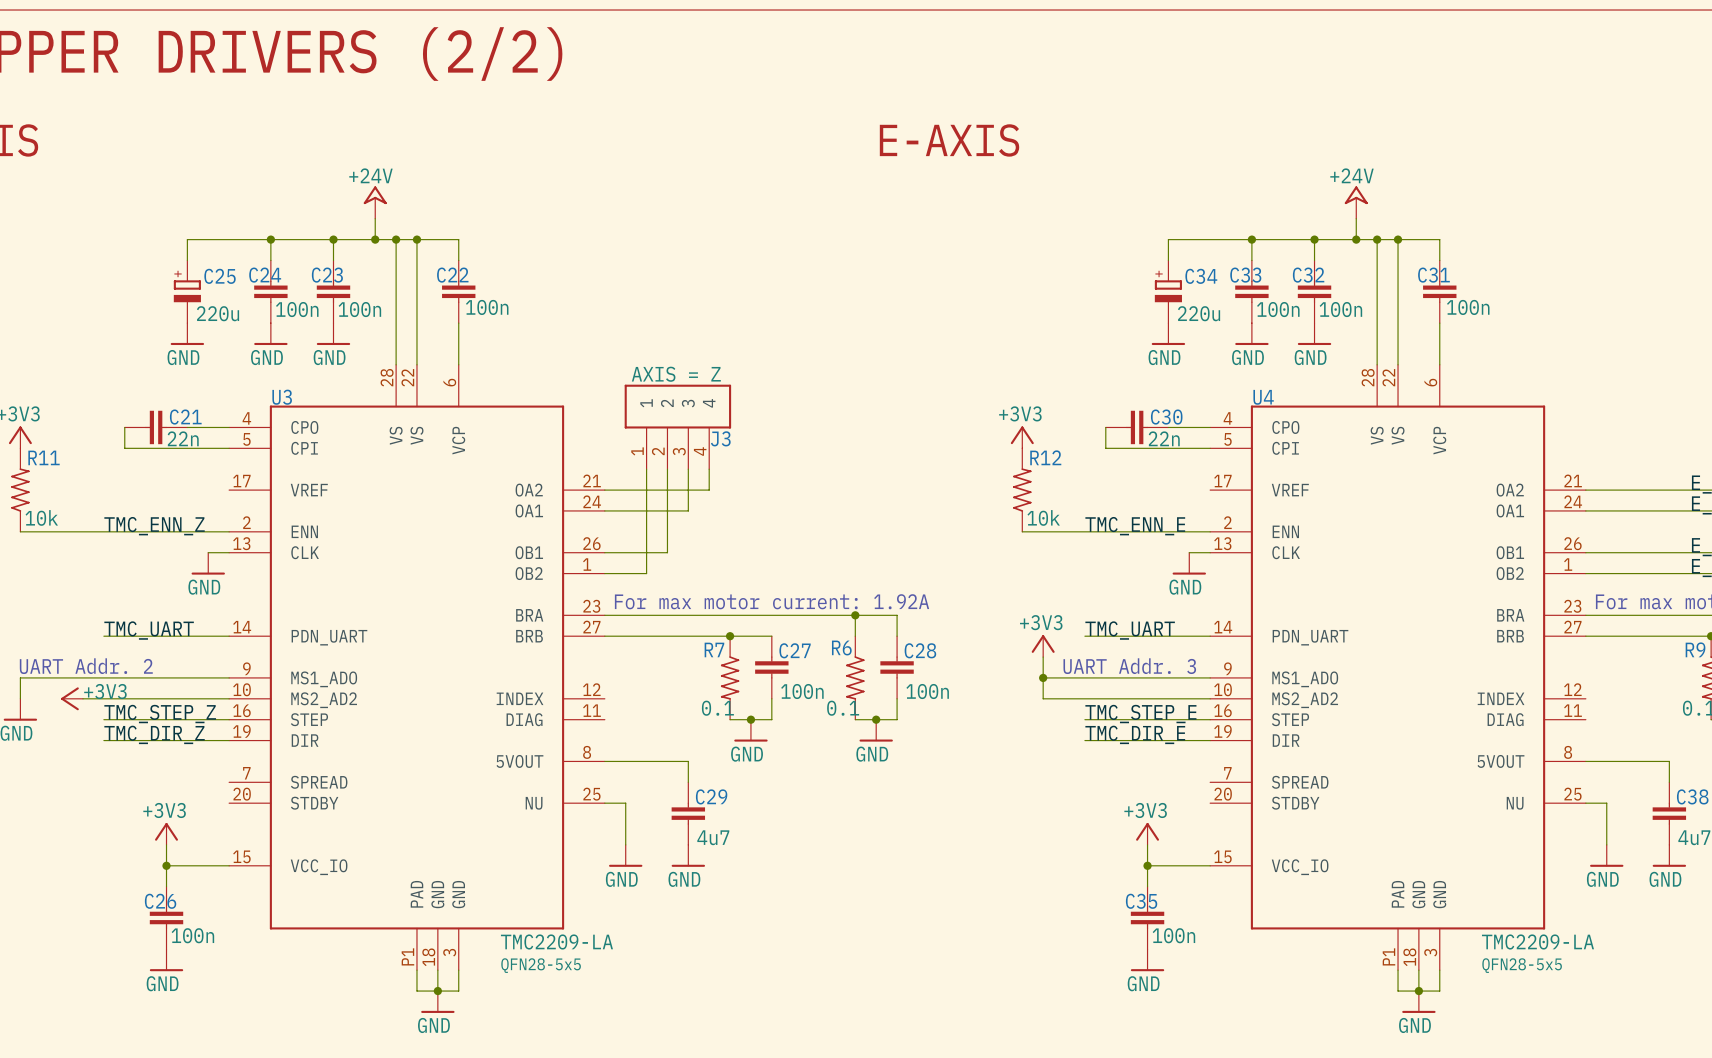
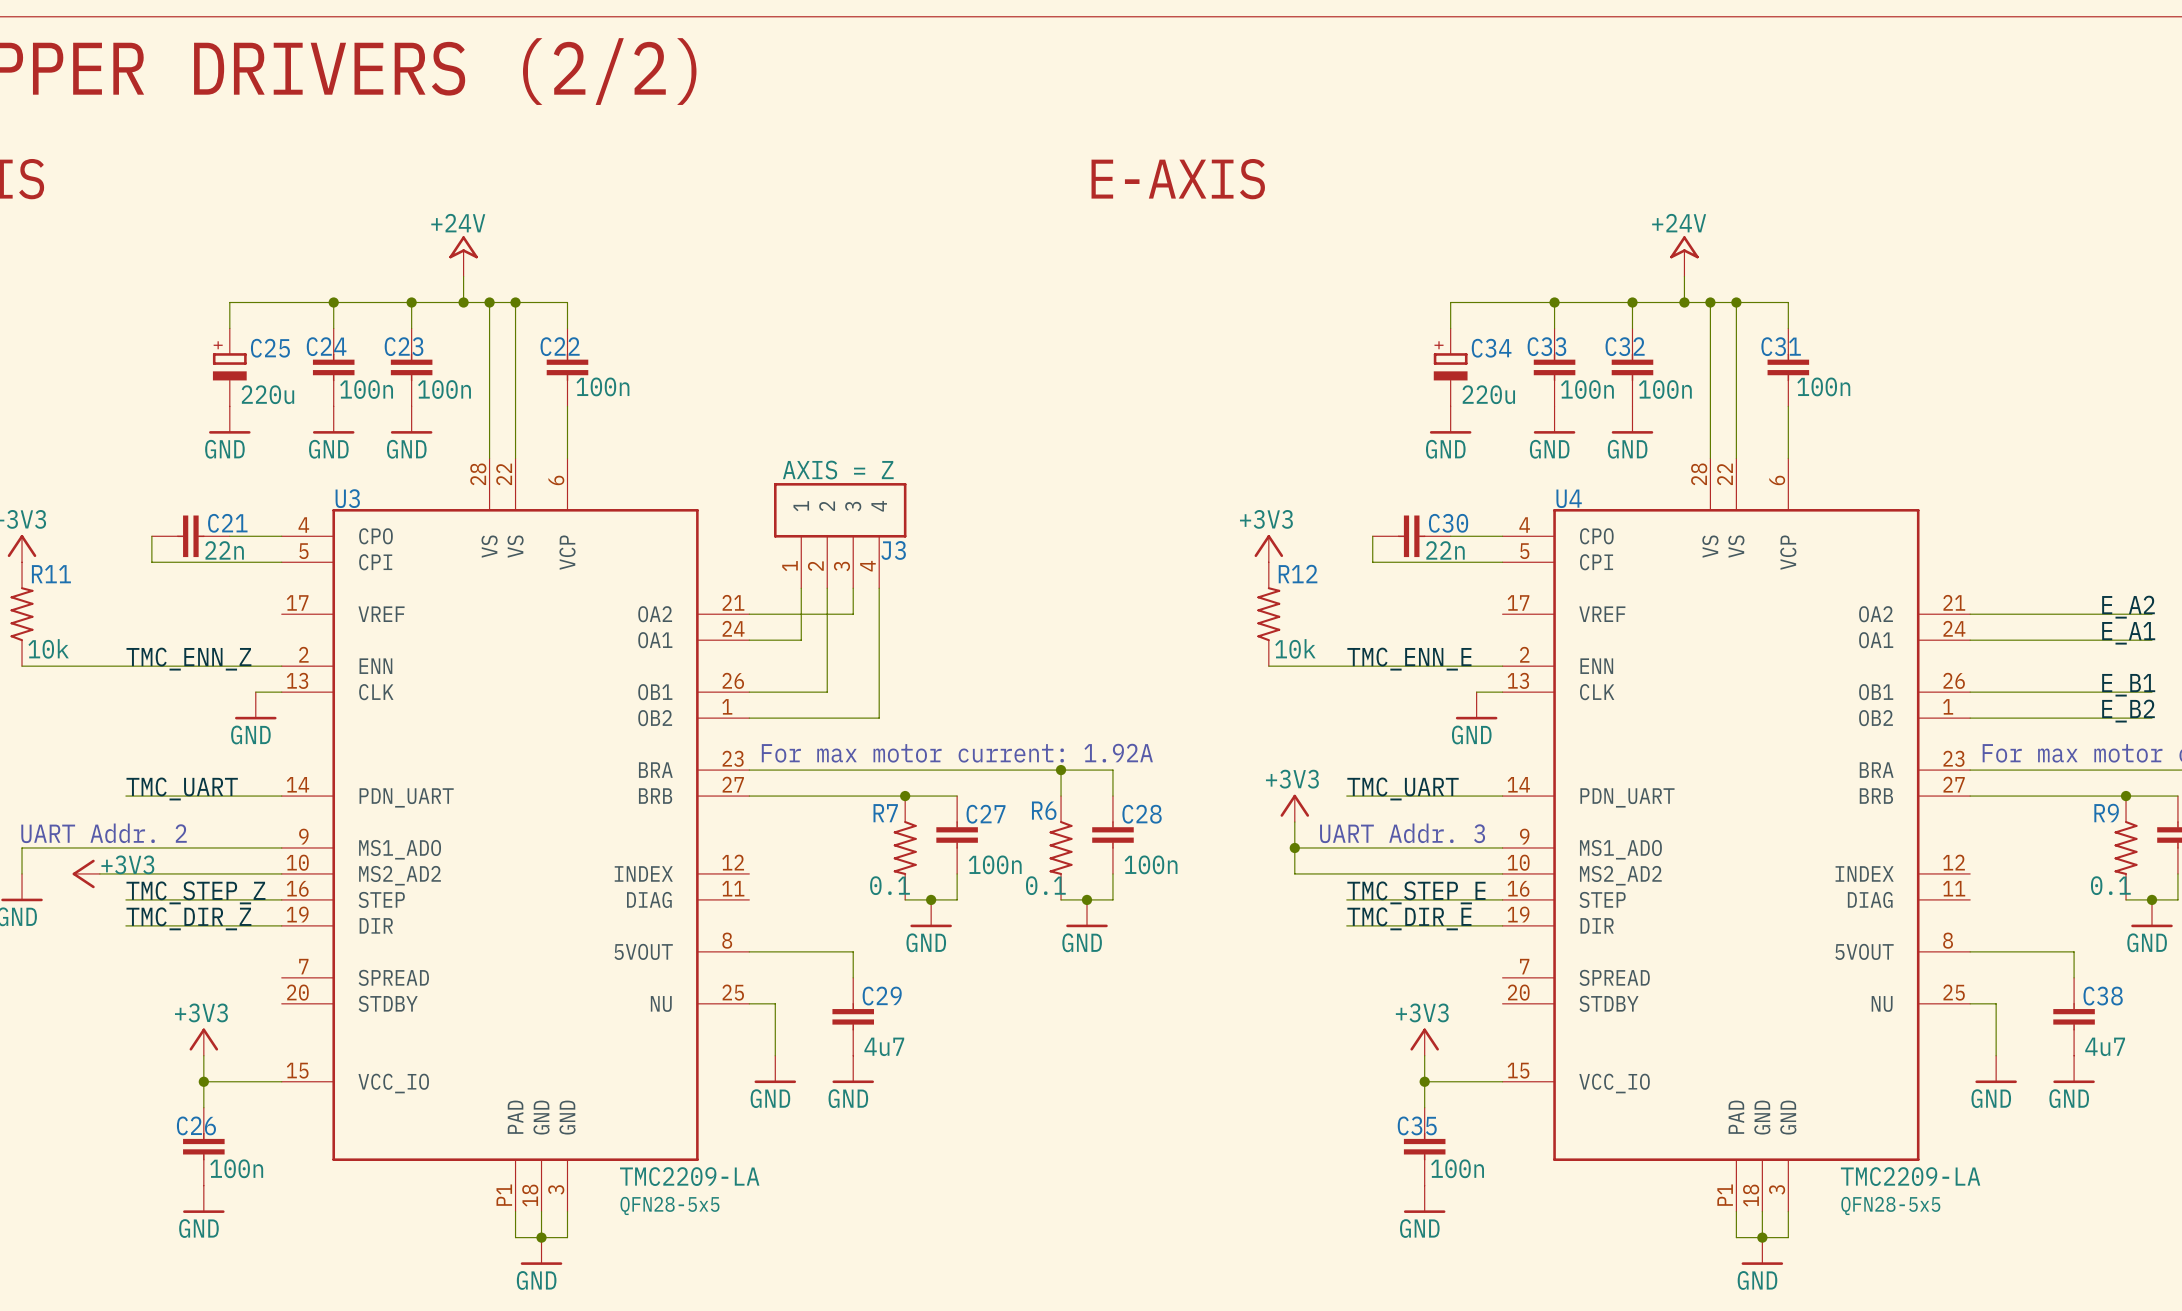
wire: (709, 490) (688, 490) (688, 510) (646, 510) (646, 573) -> (879, 614) (879, 718) (801, 718)

